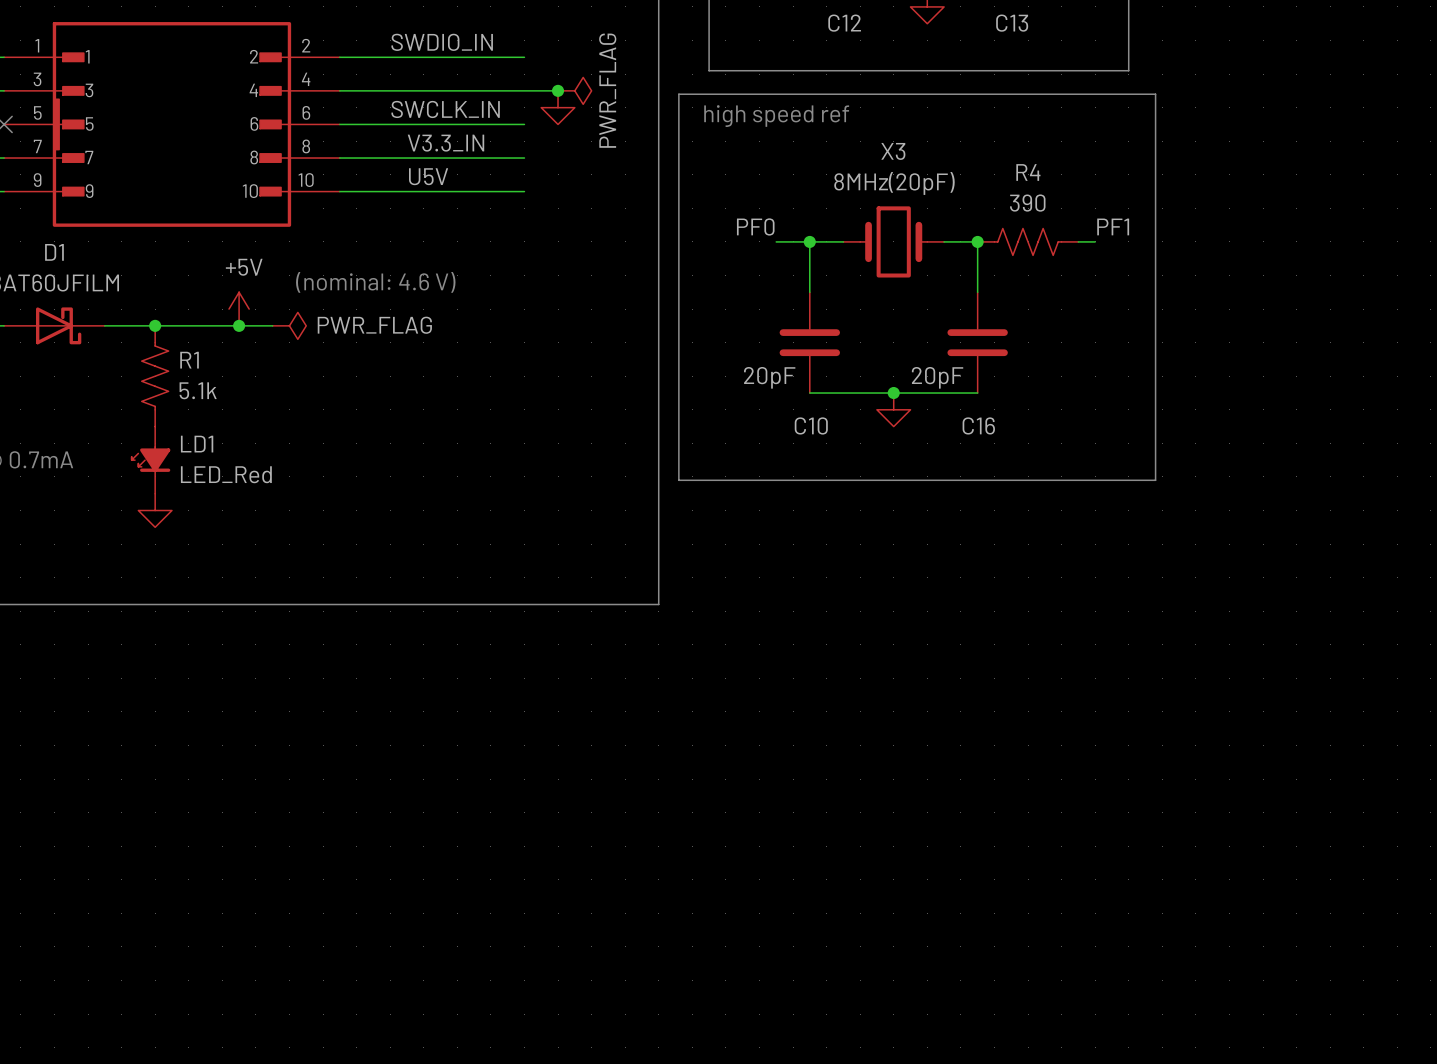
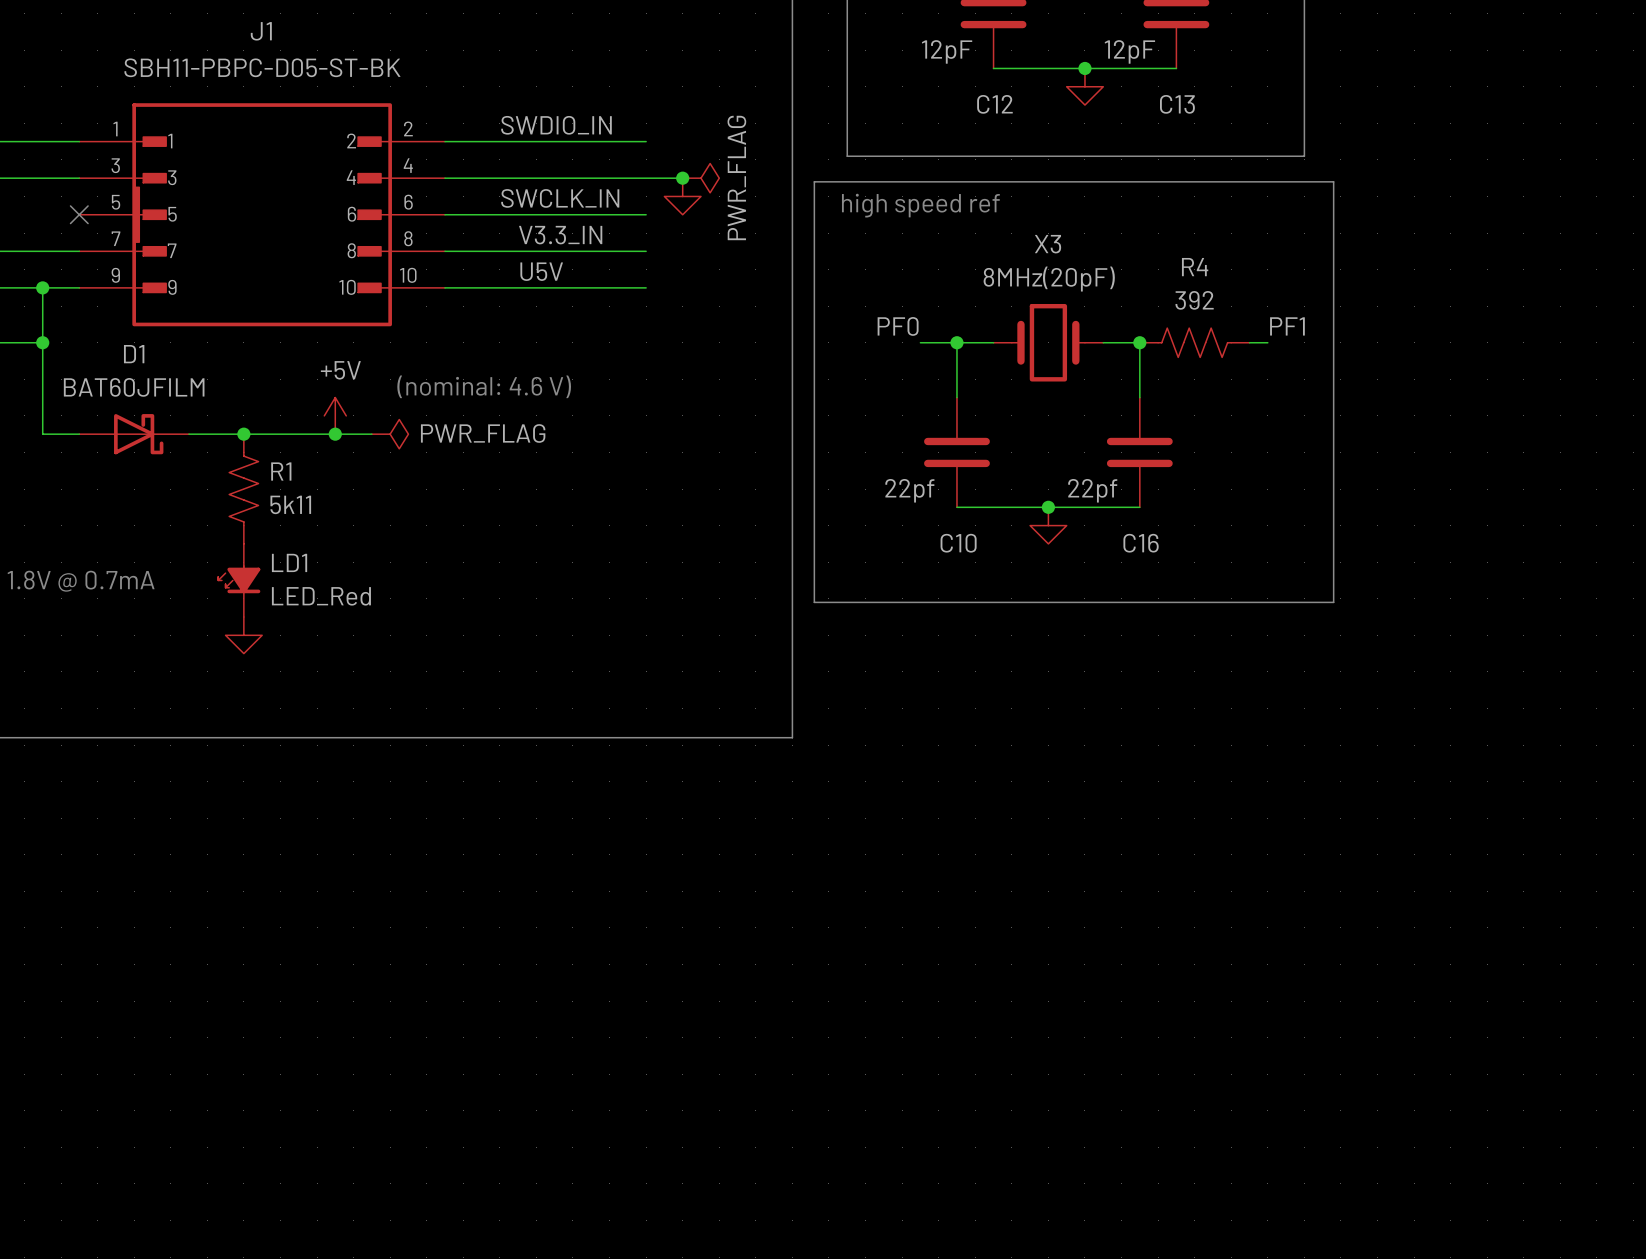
R4 value: 390 (1027, 203) -> 392 (1194, 300)
C10 value: 20pF (769, 377) -> 22pf (909, 490)
C16 value: 20pF (937, 377) -> 22pf (1092, 490)
R1 value: 5.1k (198, 390) -> 5k11 (290, 504)

